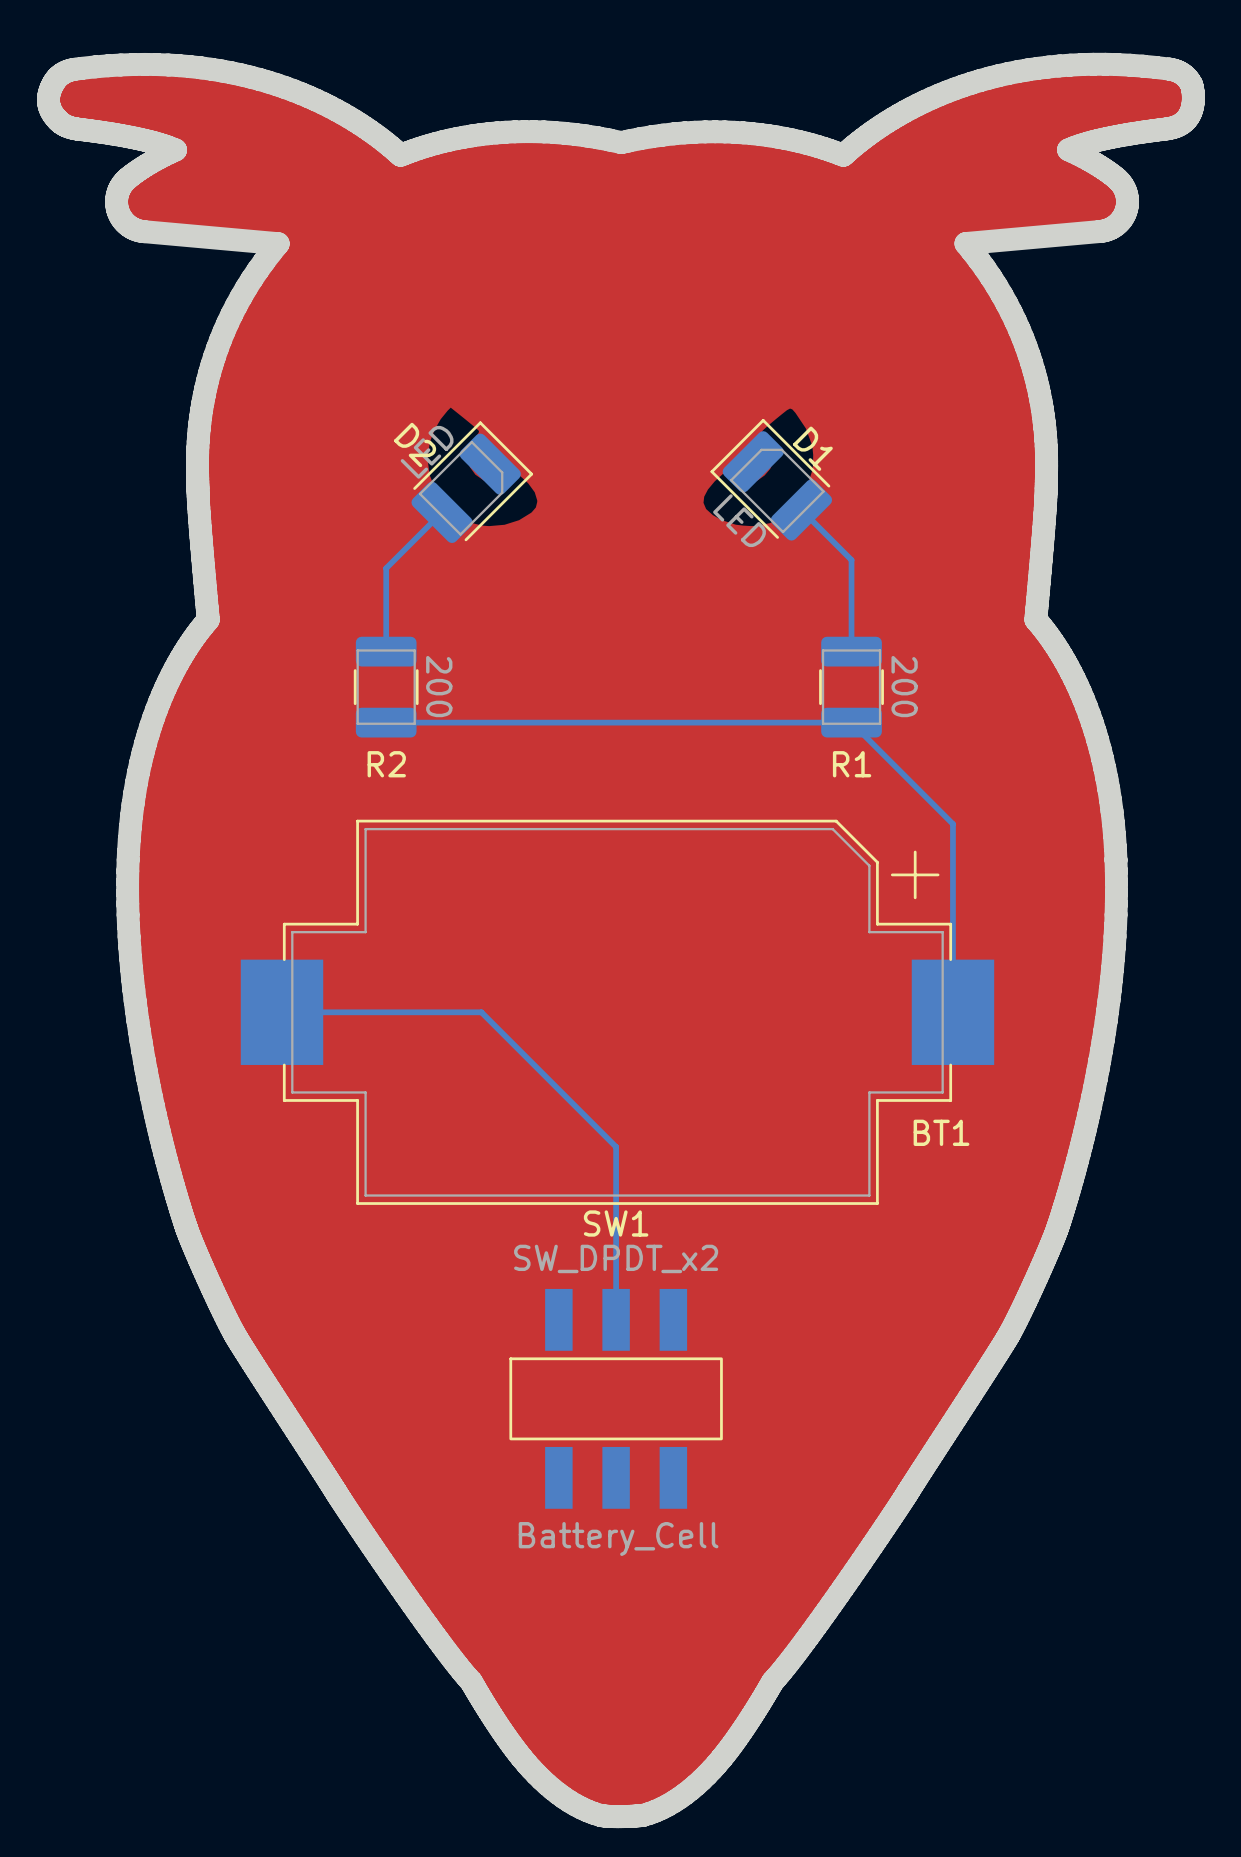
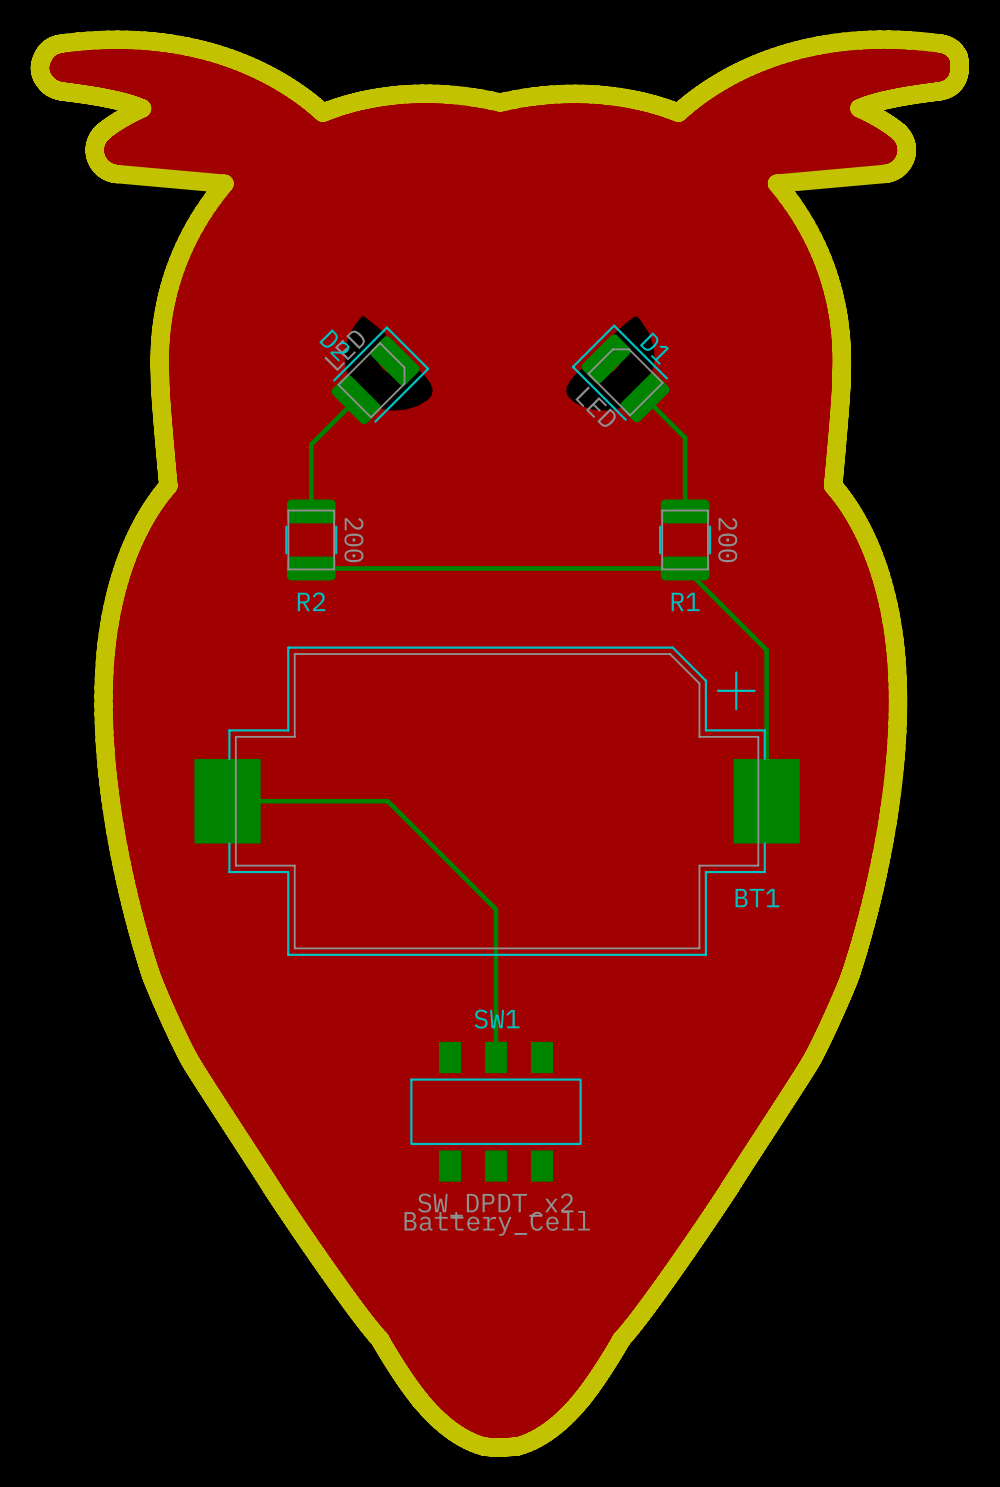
SW1 name position: SW1 (616, 1223) -> SW1 (497, 1019)
SW1 value position: SW_DPDT_x2 (616, 1258) -> SW_DPDT_x2 (495, 1205)
SW1 footprint: [509, 1288, 723, 1509] -> [410, 1041, 582, 1182]

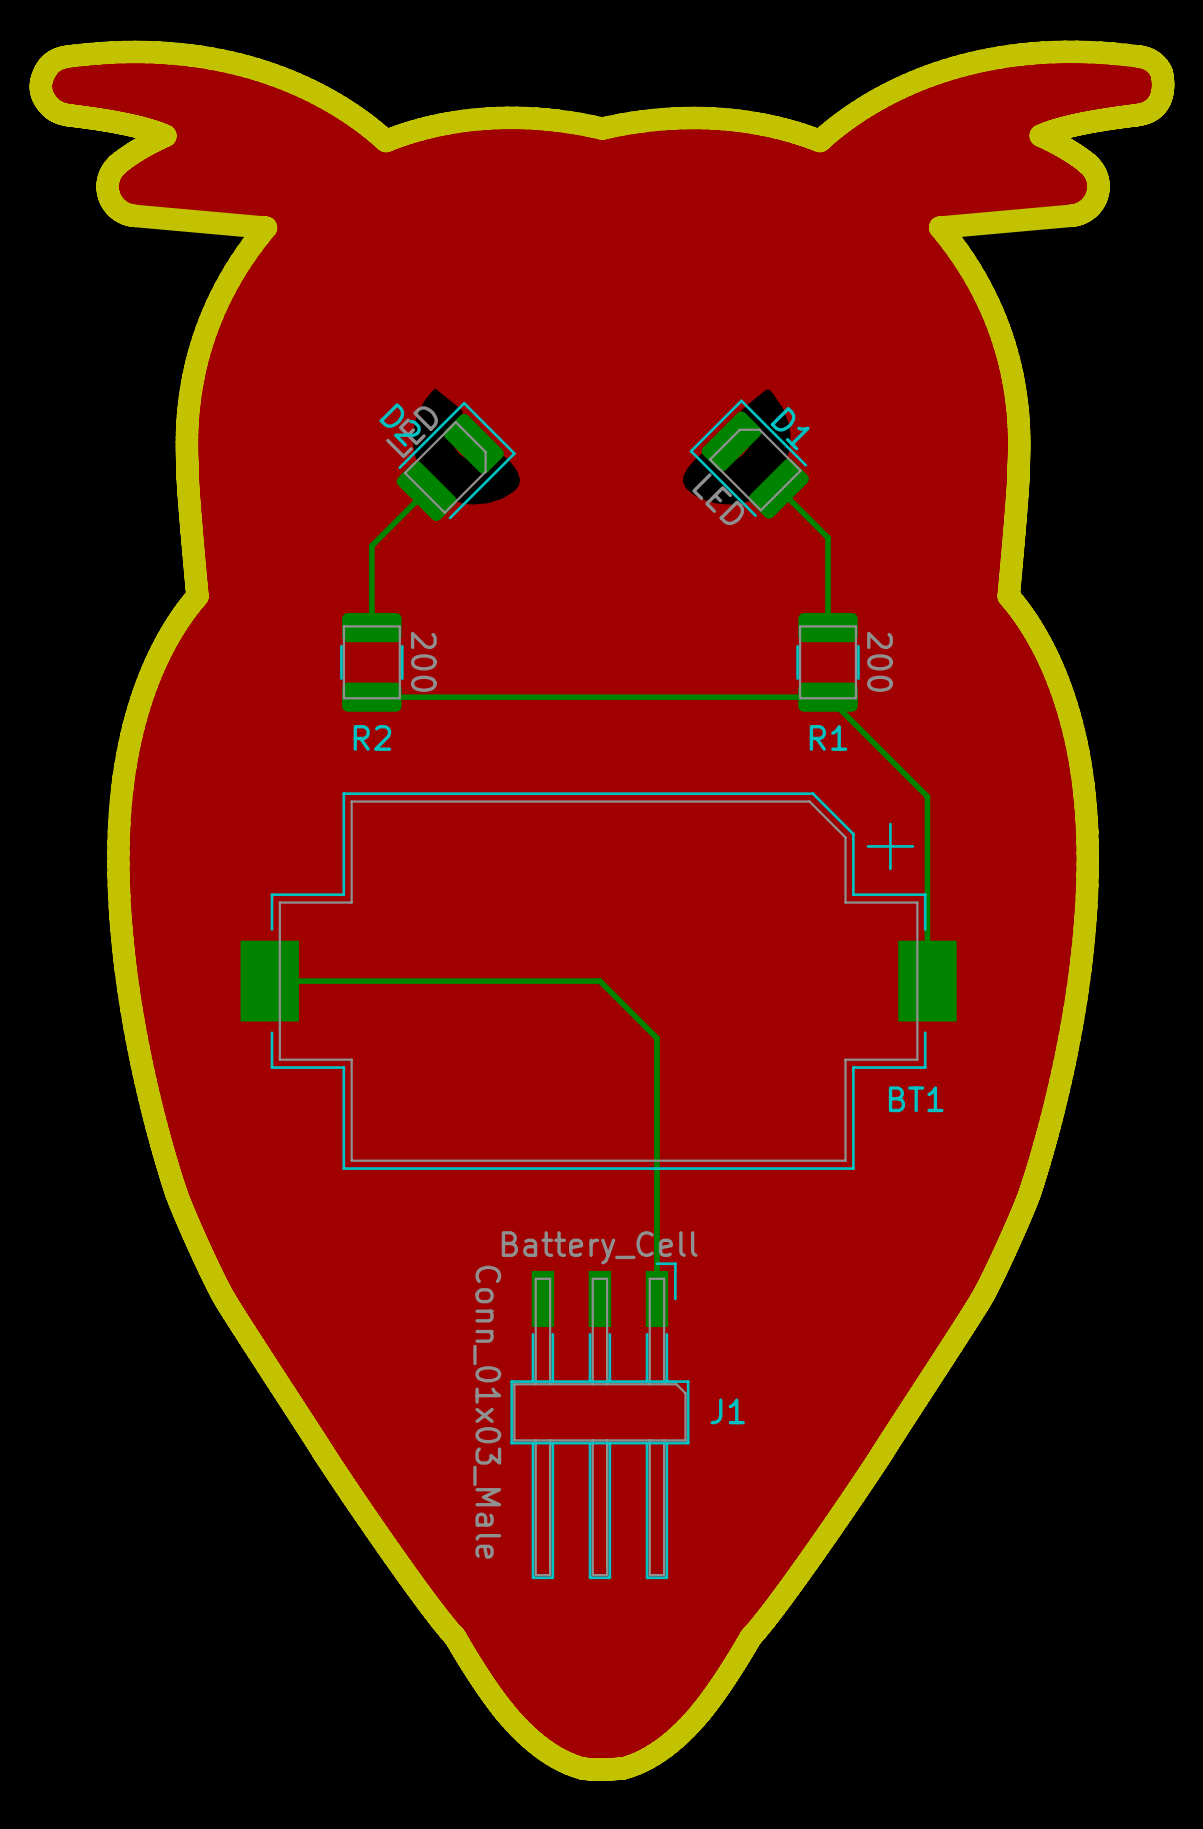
BT1 footprint: [194, 646, 800, 956] -> [240, 792, 957, 1170]
bottom track: (387, 801) (495, 909) (495, 1057) -> (465, 981) (599, 981) (656, 1038) (656, 1298)
SW1: SW_DPDT_x2 (495, 1111) -> none
J1: none -> Conn_01x03_Male (599, 1420)
BT1 value position: Battery_Cell (497, 1223) -> Battery_Cell (599, 1247)

